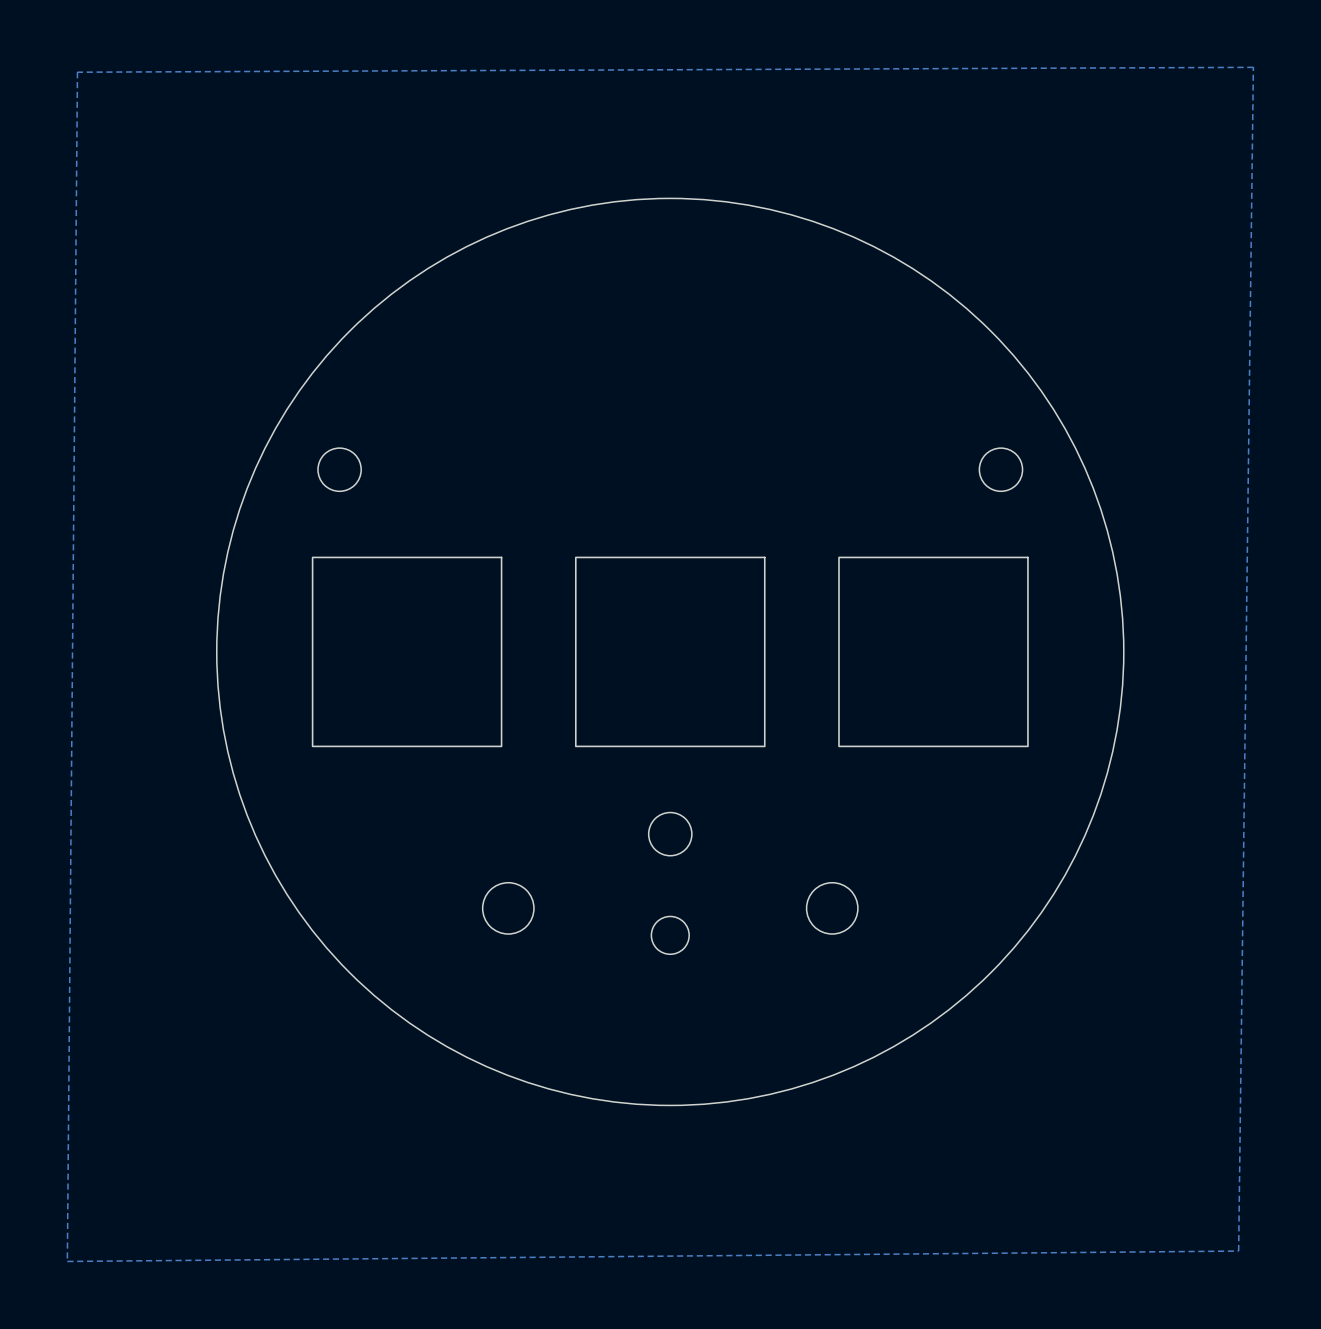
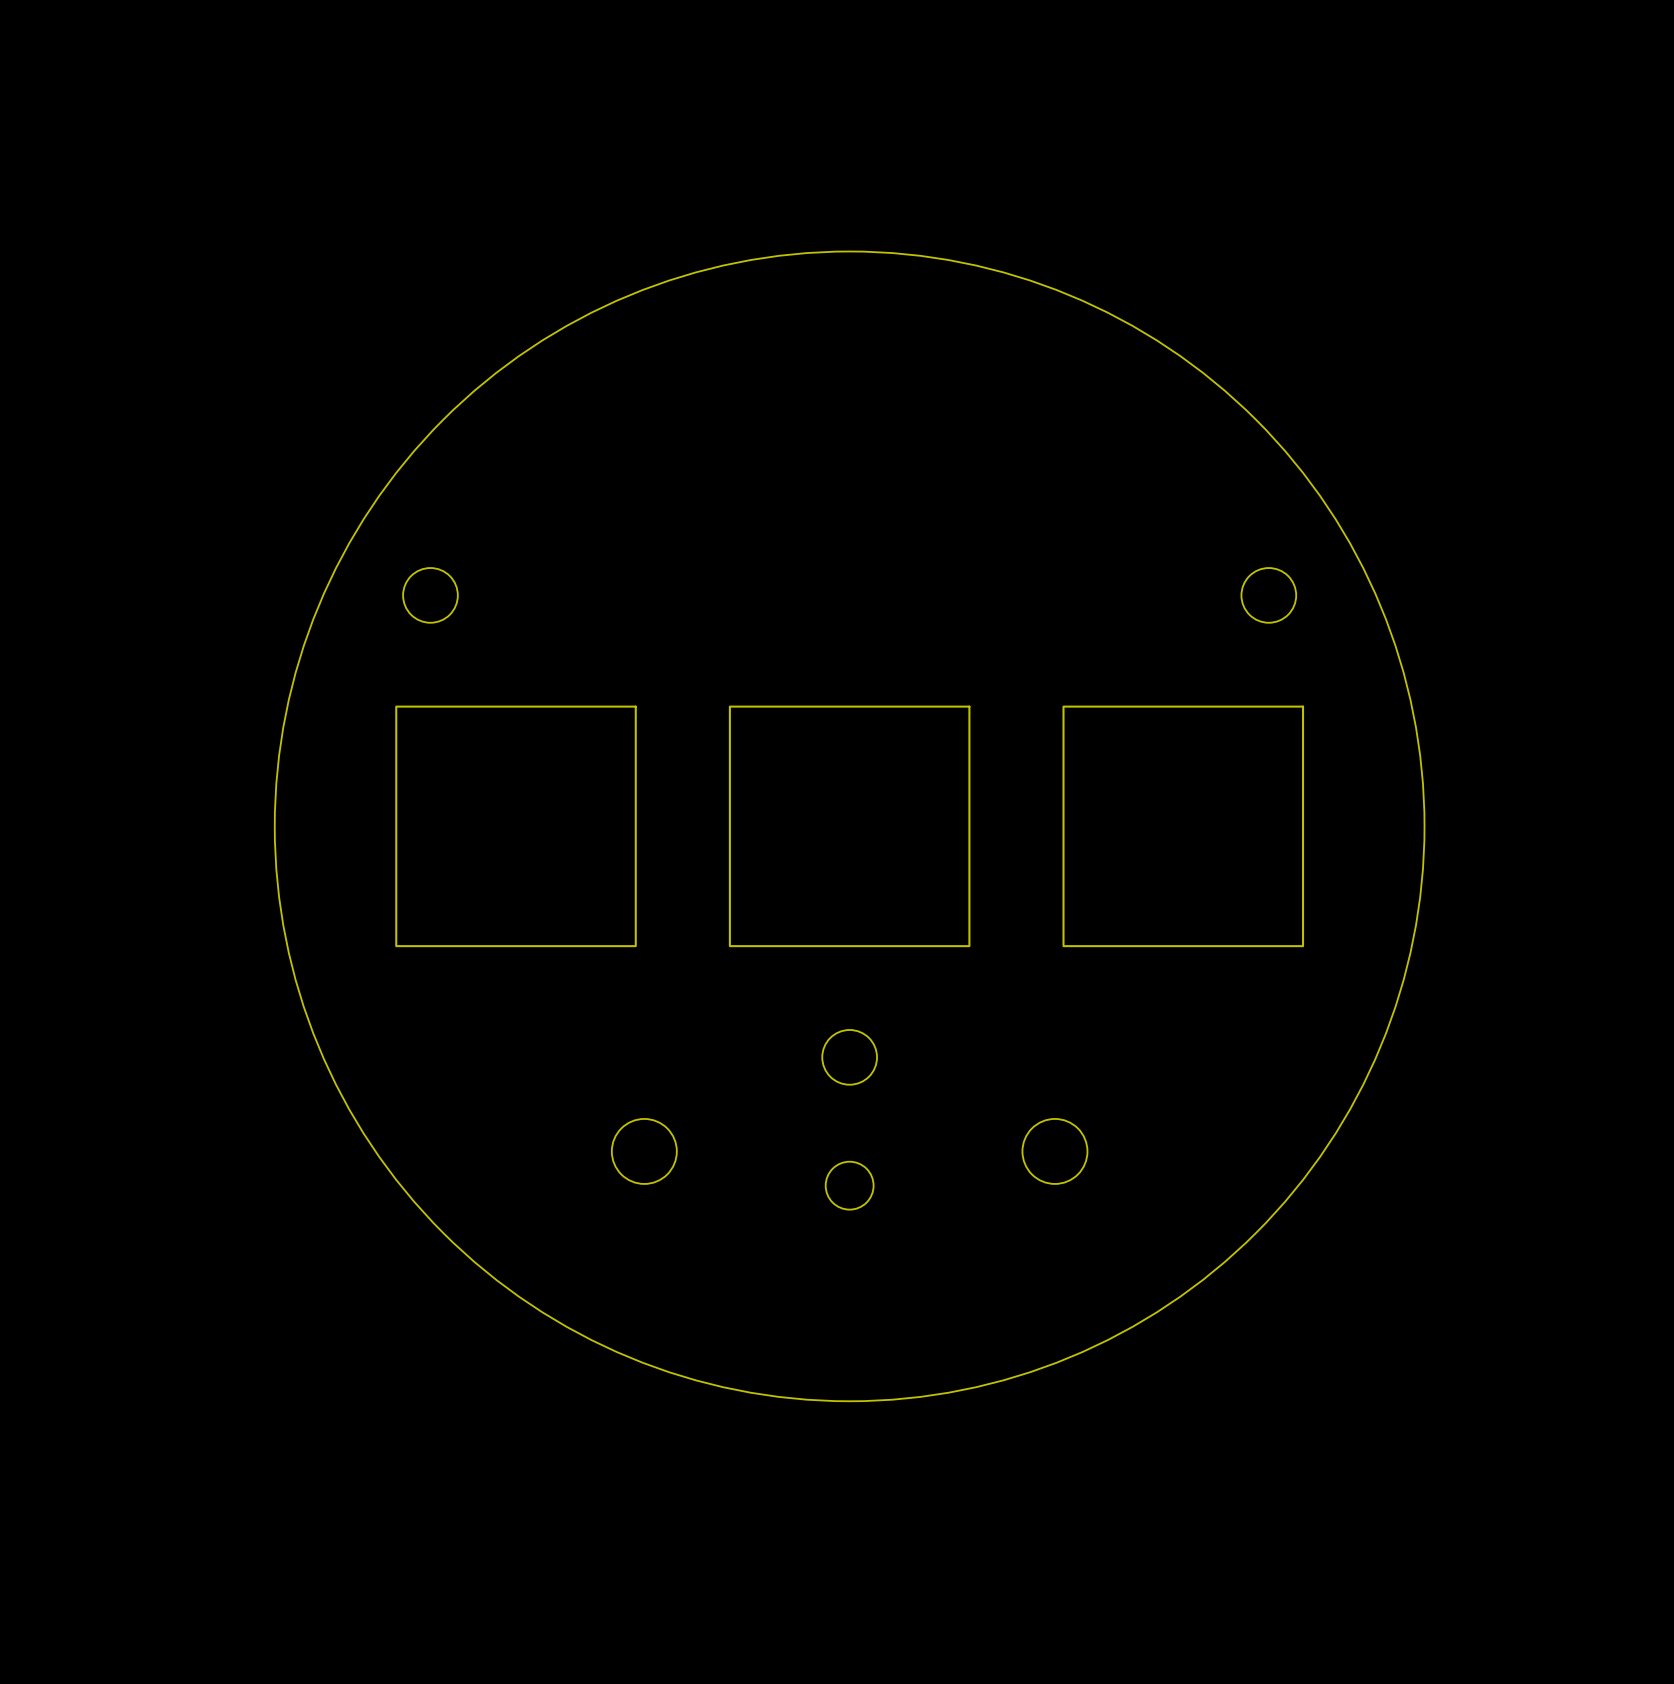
zone outline: (1253, 67) (1238, 1251) (67, 1261) (77, 72) (1253, 67) -> none

